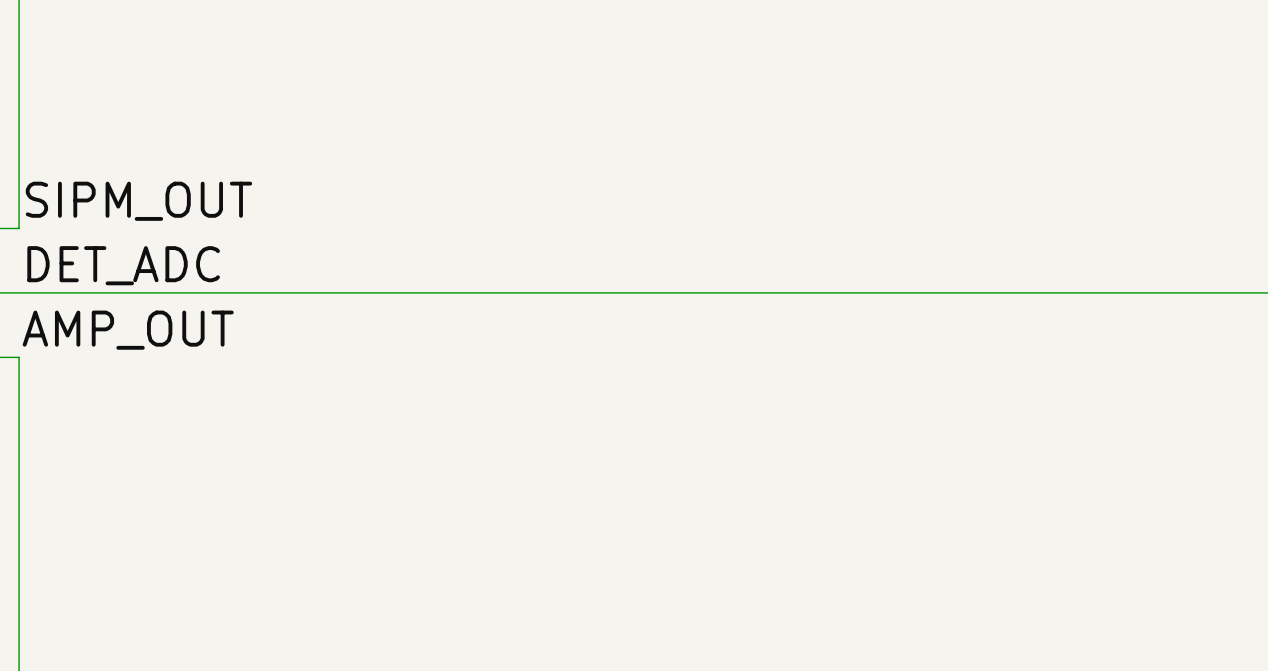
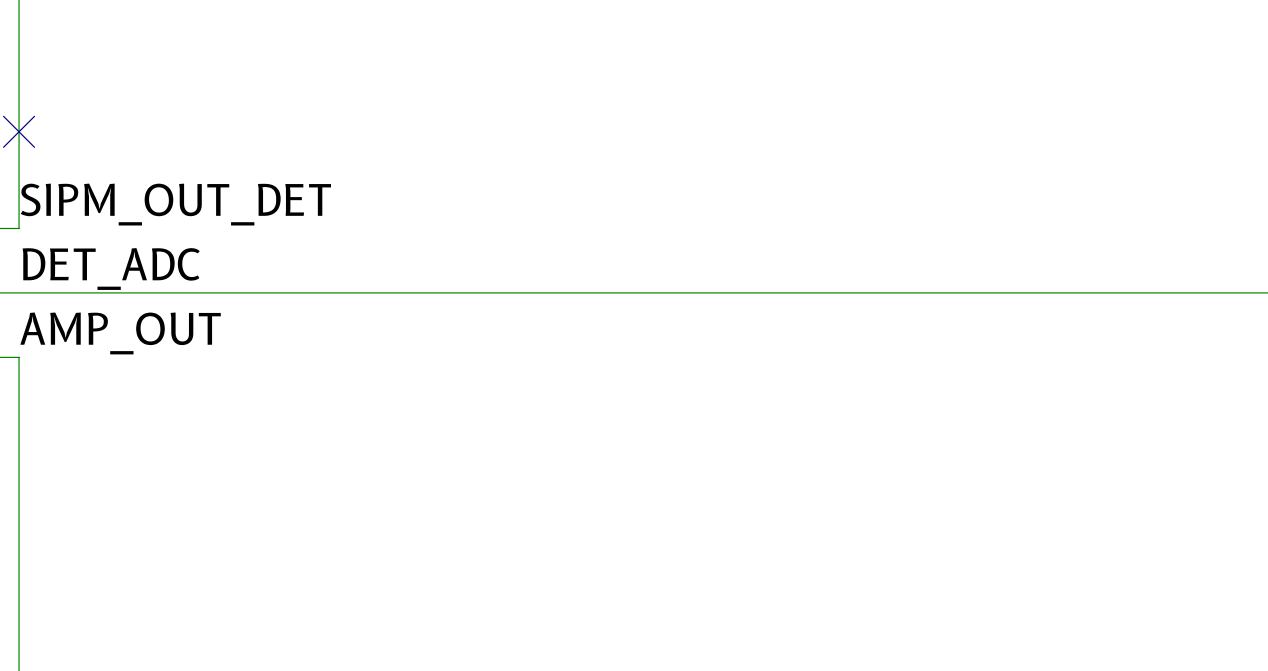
no-connect mark: none -> (19, 131)
label: SIPM_OUT (138, 201) -> SIPM_OUT_DET (175, 204)

